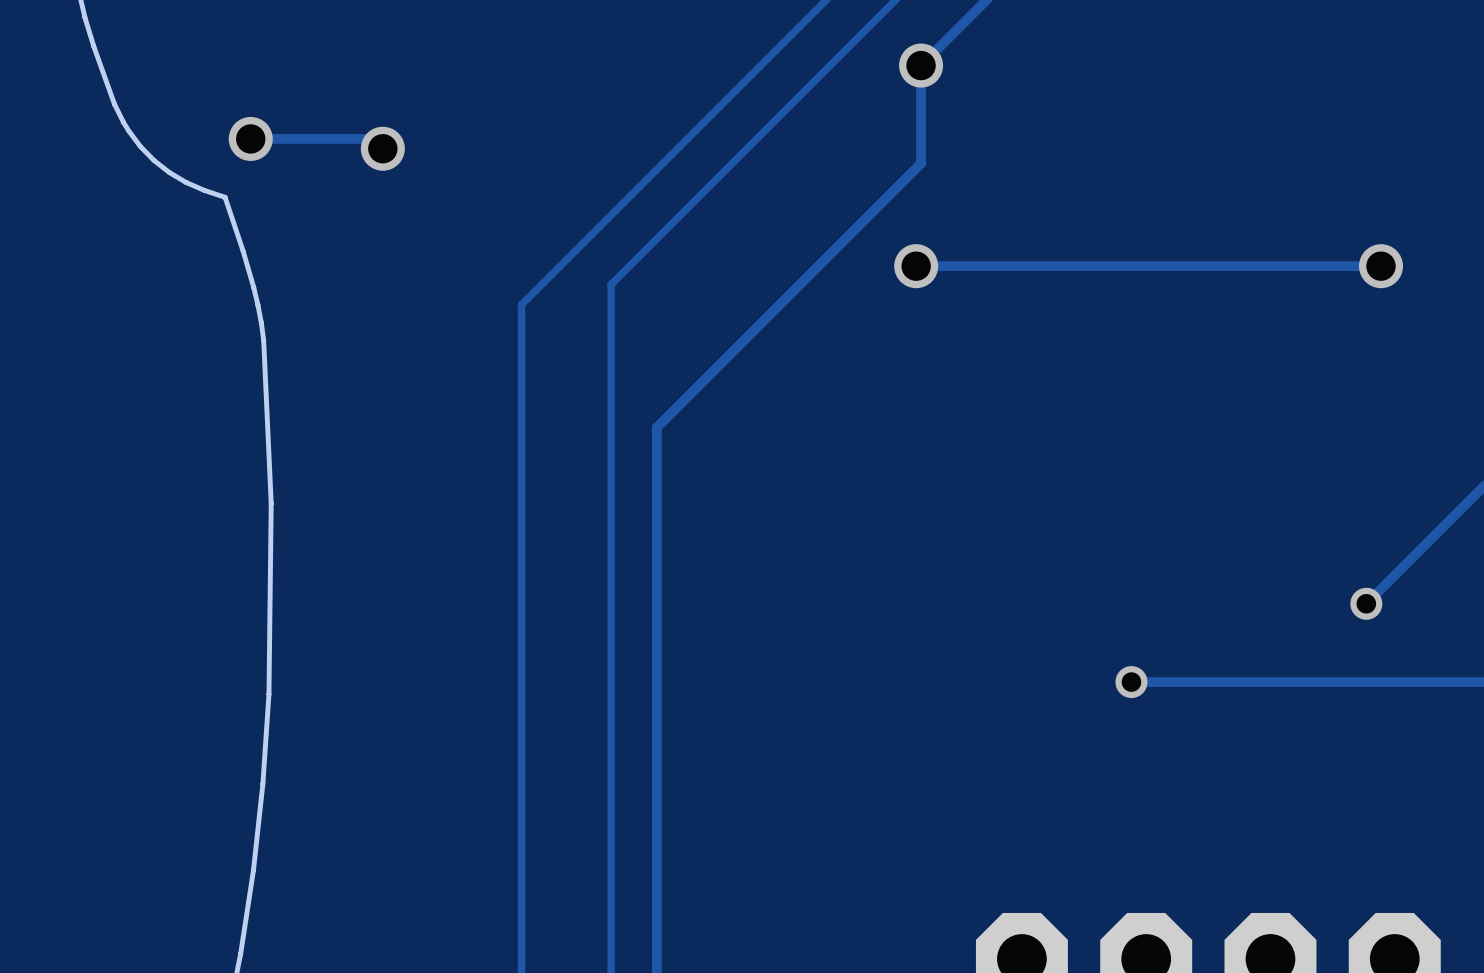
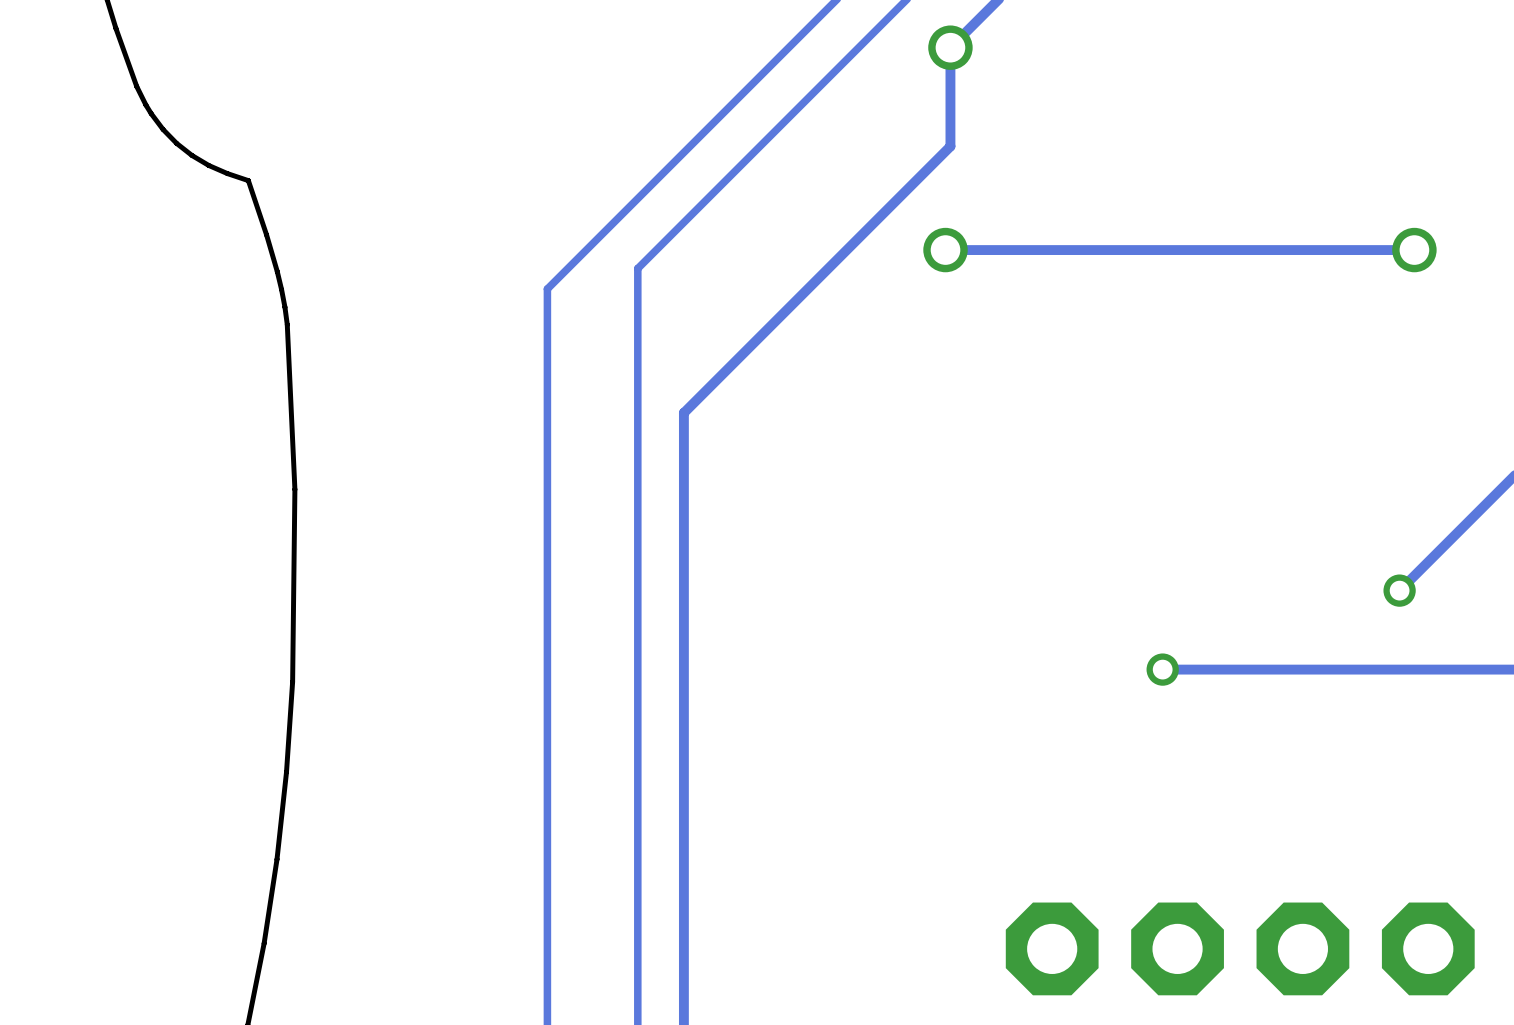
track: (250, 138) (373, 138) (382, 148) -> none
via: (250, 138) -> none
via: (382, 148) -> none

